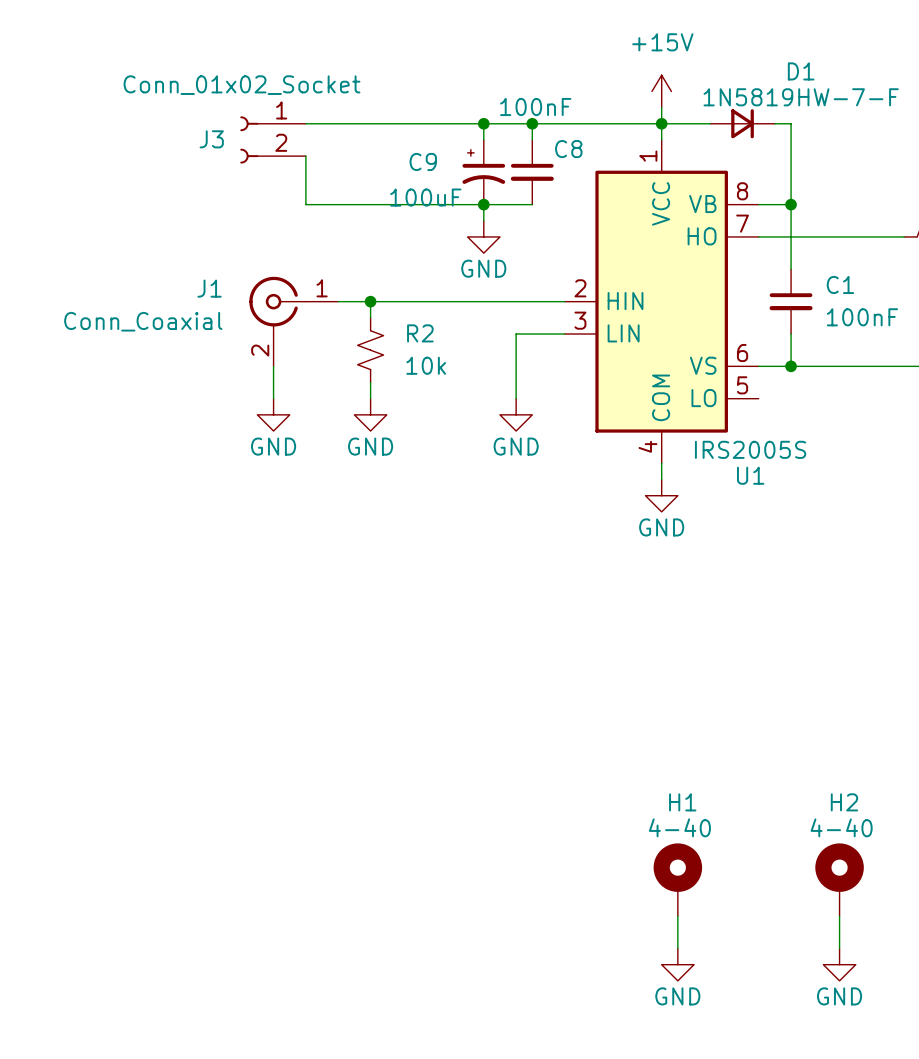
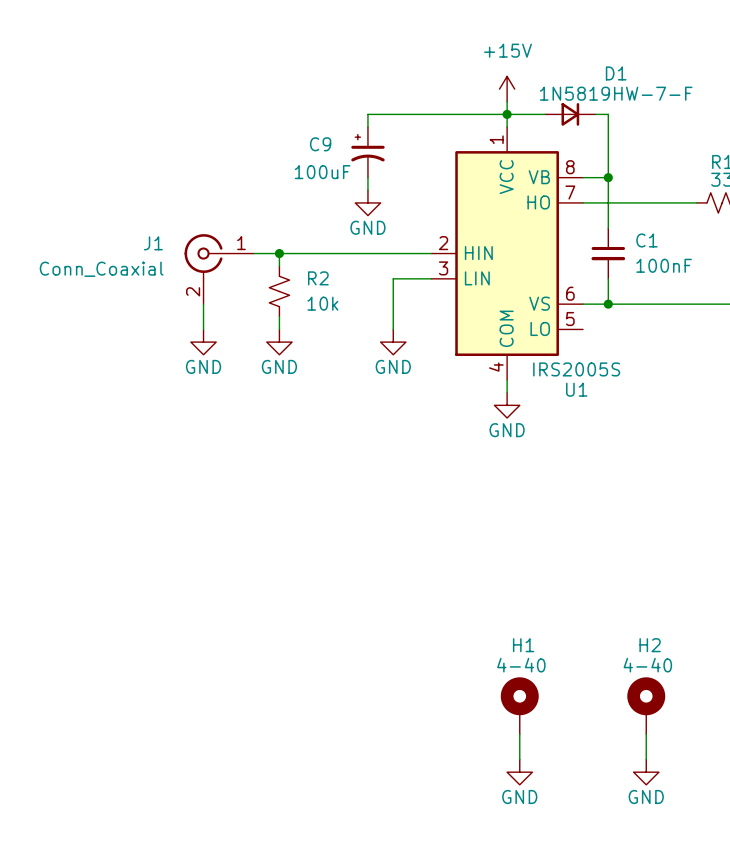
wire: (305, 123) (483, 123) -> none
junction: (483, 123) -> none
wire: (532, 123) (532, 139) -> none
junction: (532, 123) -> none
J3: Conn_01x02_Socket (273, 139) -> none
wire: (305, 156) (305, 204) (532, 204) -> none
C8: 100nF (532, 172) -> none
junction: (483, 204) -> none

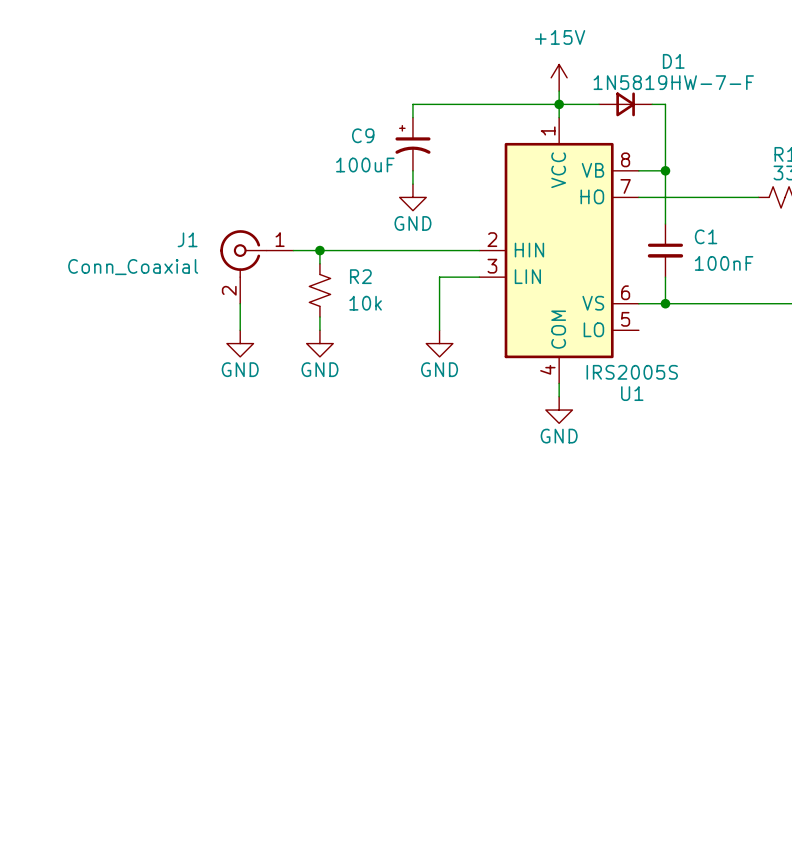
H1: 4-40 (519, 705) -> none
H2: 4-40 (646, 705) -> none
wire: (519, 734) (519, 759) -> none
wire: (646, 734) (646, 759) -> none
power symbol: GND (519, 772) -> none
power symbol: GND (646, 772) -> none

